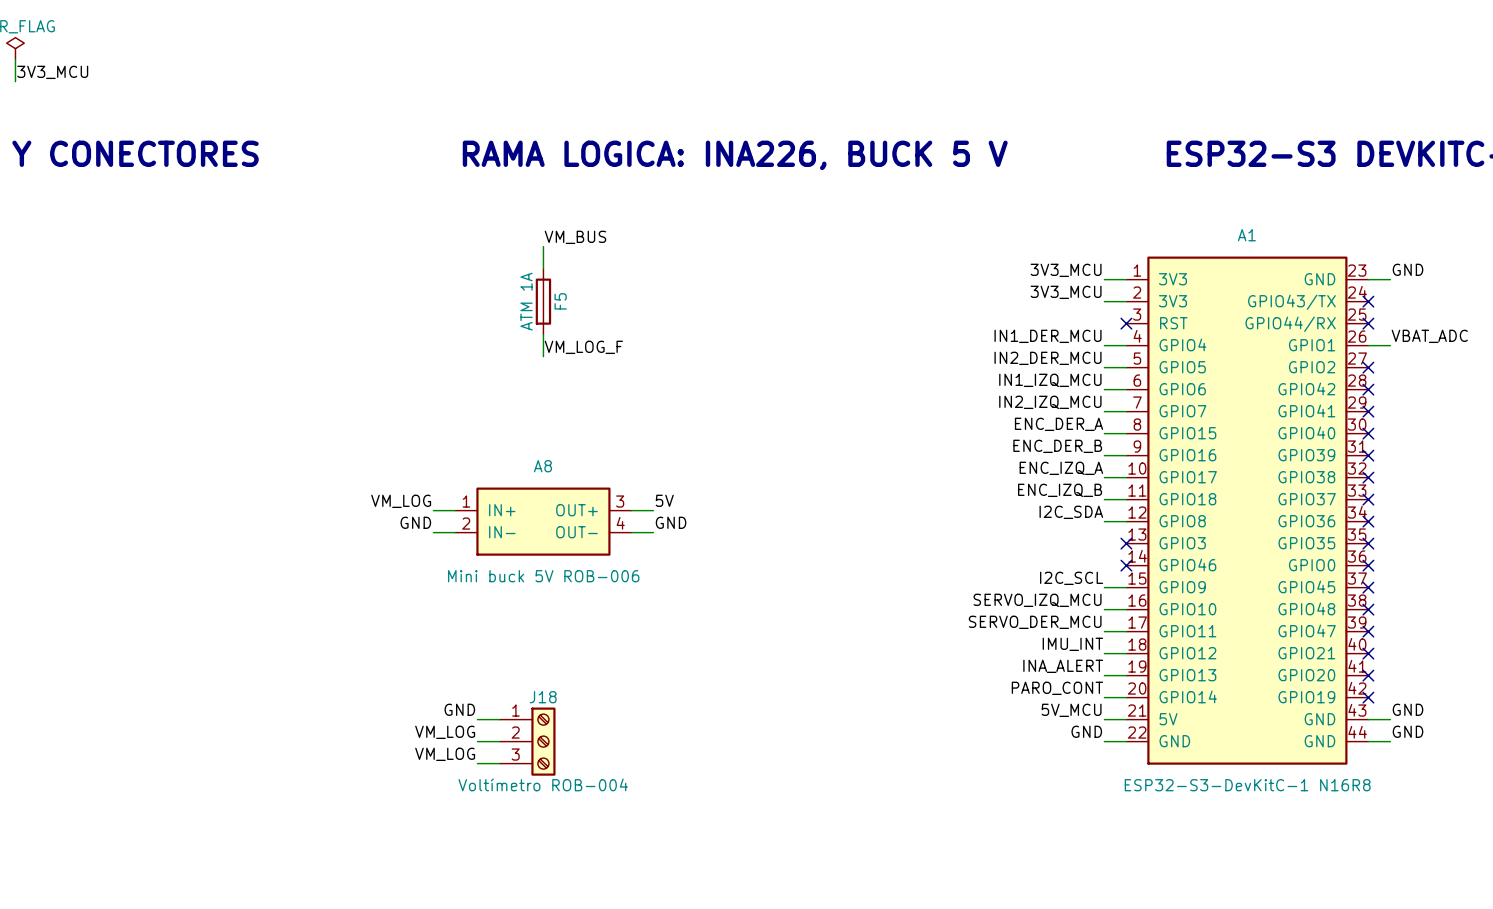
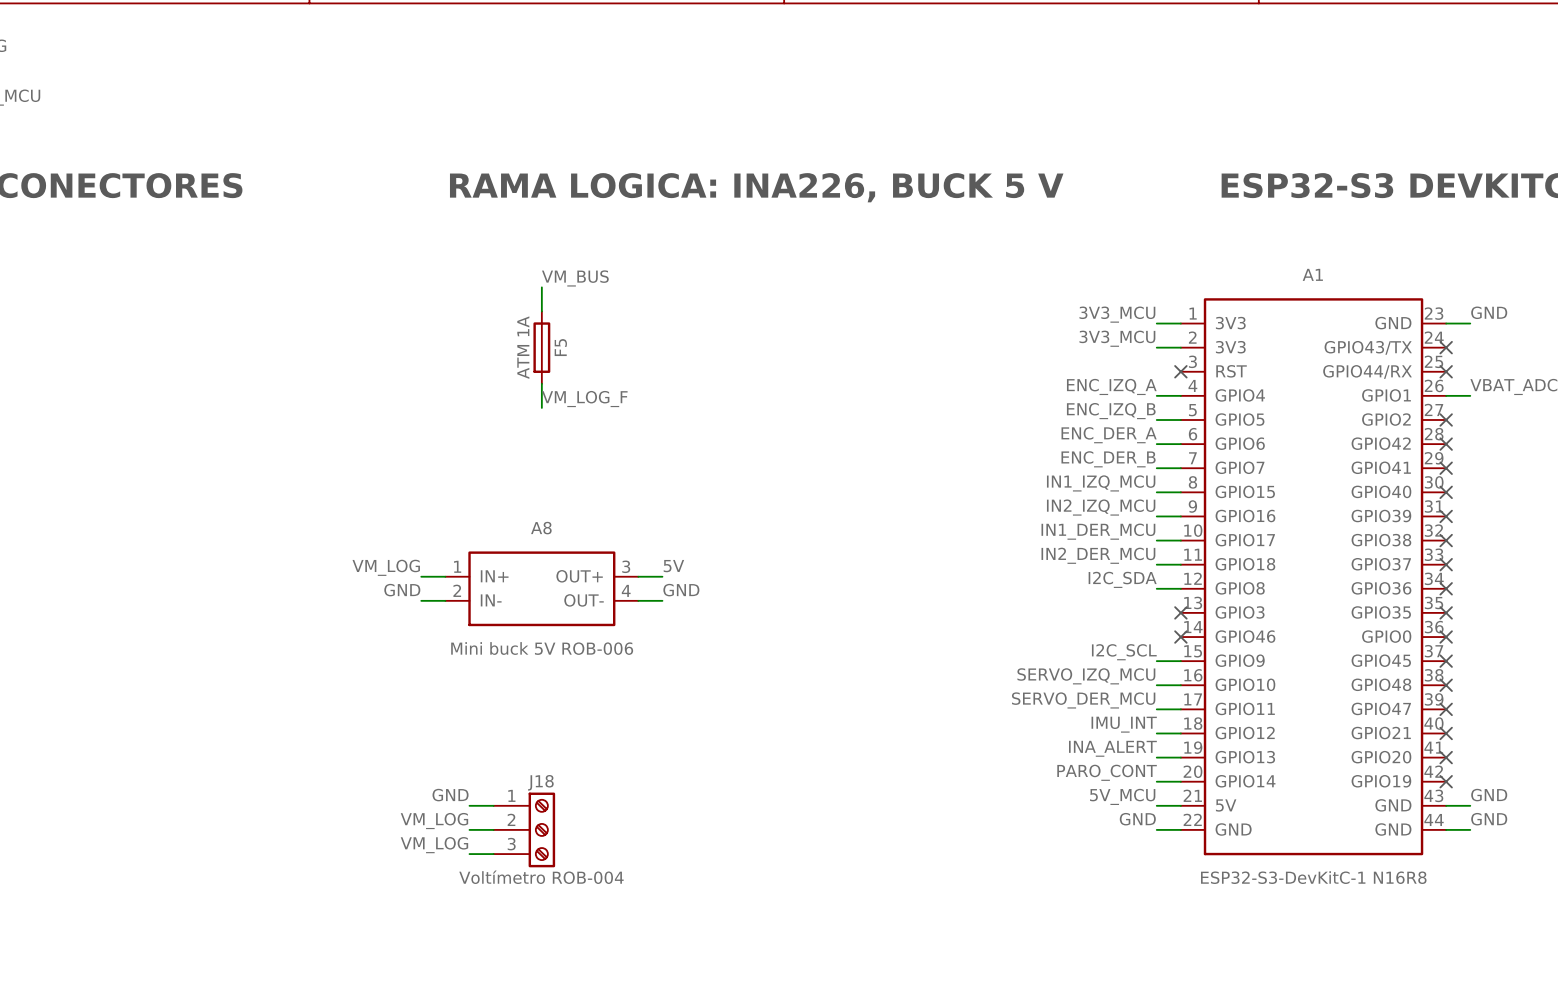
label: IN1_DER_MCU (1048, 336) -> ENC_IZQ_A (1111, 386)
label: IN2_DER_MCU (1048, 358) -> ENC_IZQ_B (1111, 411)
label: IN1_IZQ_MCU (1050, 380) -> ENC_DER_A (1109, 435)
label: IN2_IZQ_MCU (1050, 402) -> ENC_DER_B (1108, 459)
label: ENC_DER_A (1059, 424) -> IN1_IZQ_MCU (1101, 483)
label: ENC_DER_B (1057, 446) -> IN2_IZQ_MCU (1101, 507)
label: ENC_IZQ_A (1061, 468) -> IN1_DER_MCU (1098, 531)
label: ENC_IZQ_B (1060, 490) -> IN2_DER_MCU (1098, 555)

